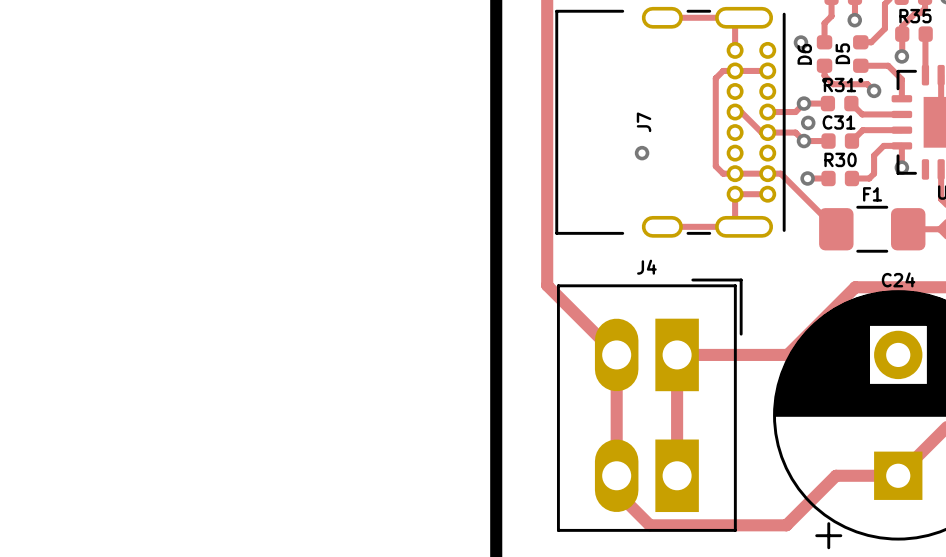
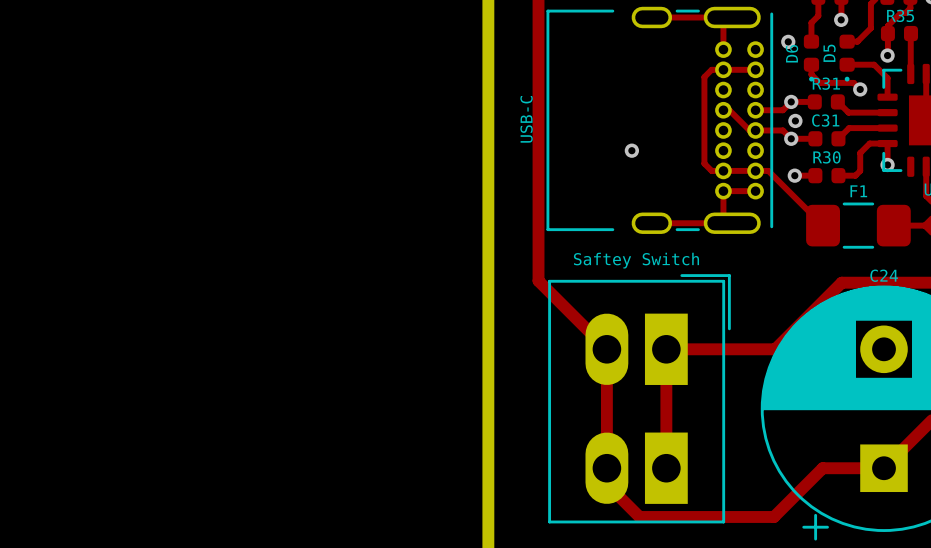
J7 name: J7 (644, 122) -> USB-C (526, 119)
J4 name: J4 (646, 267) -> Saftey Switch (636, 260)

